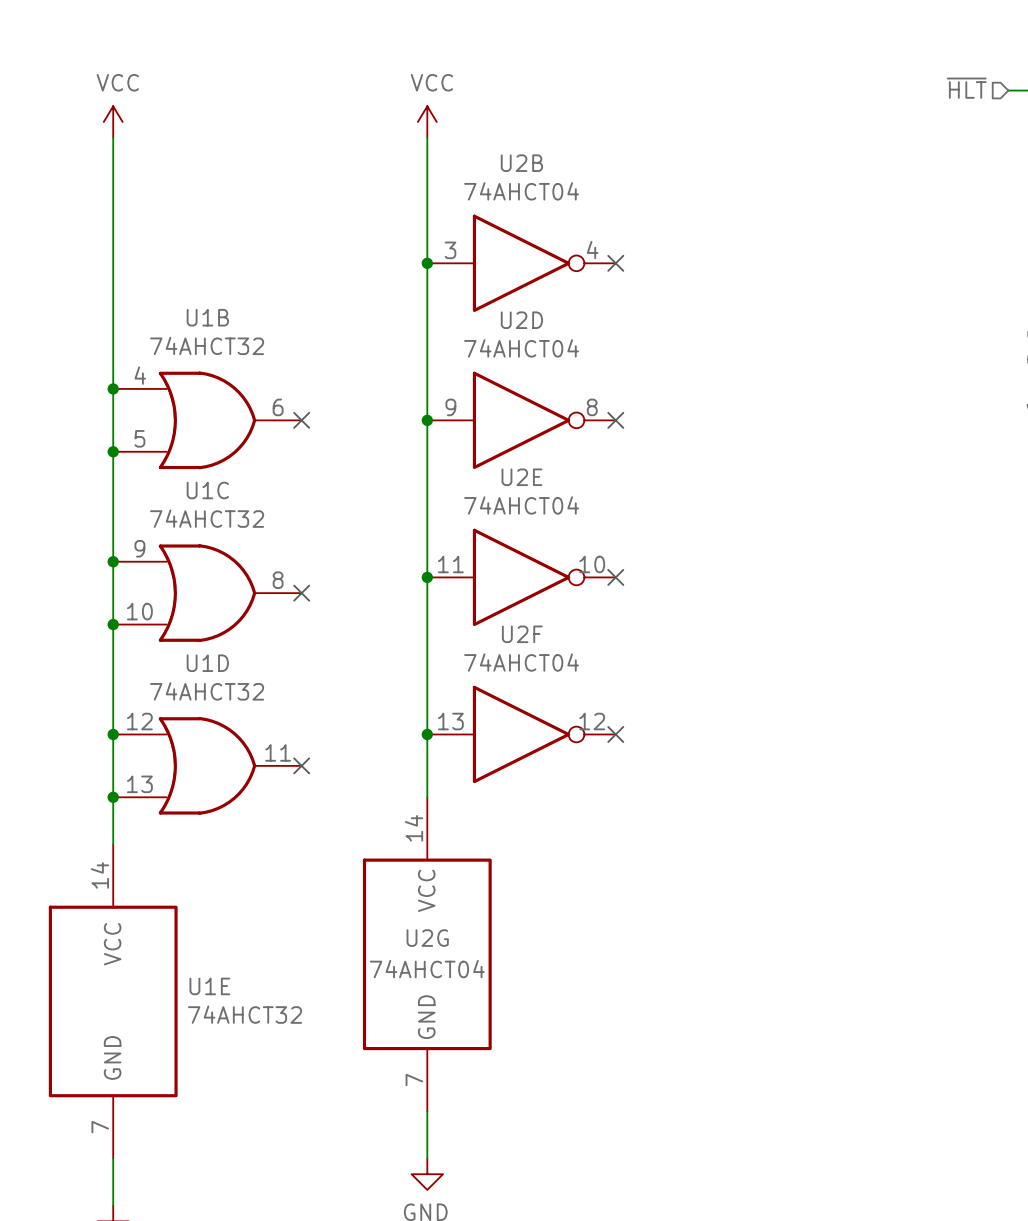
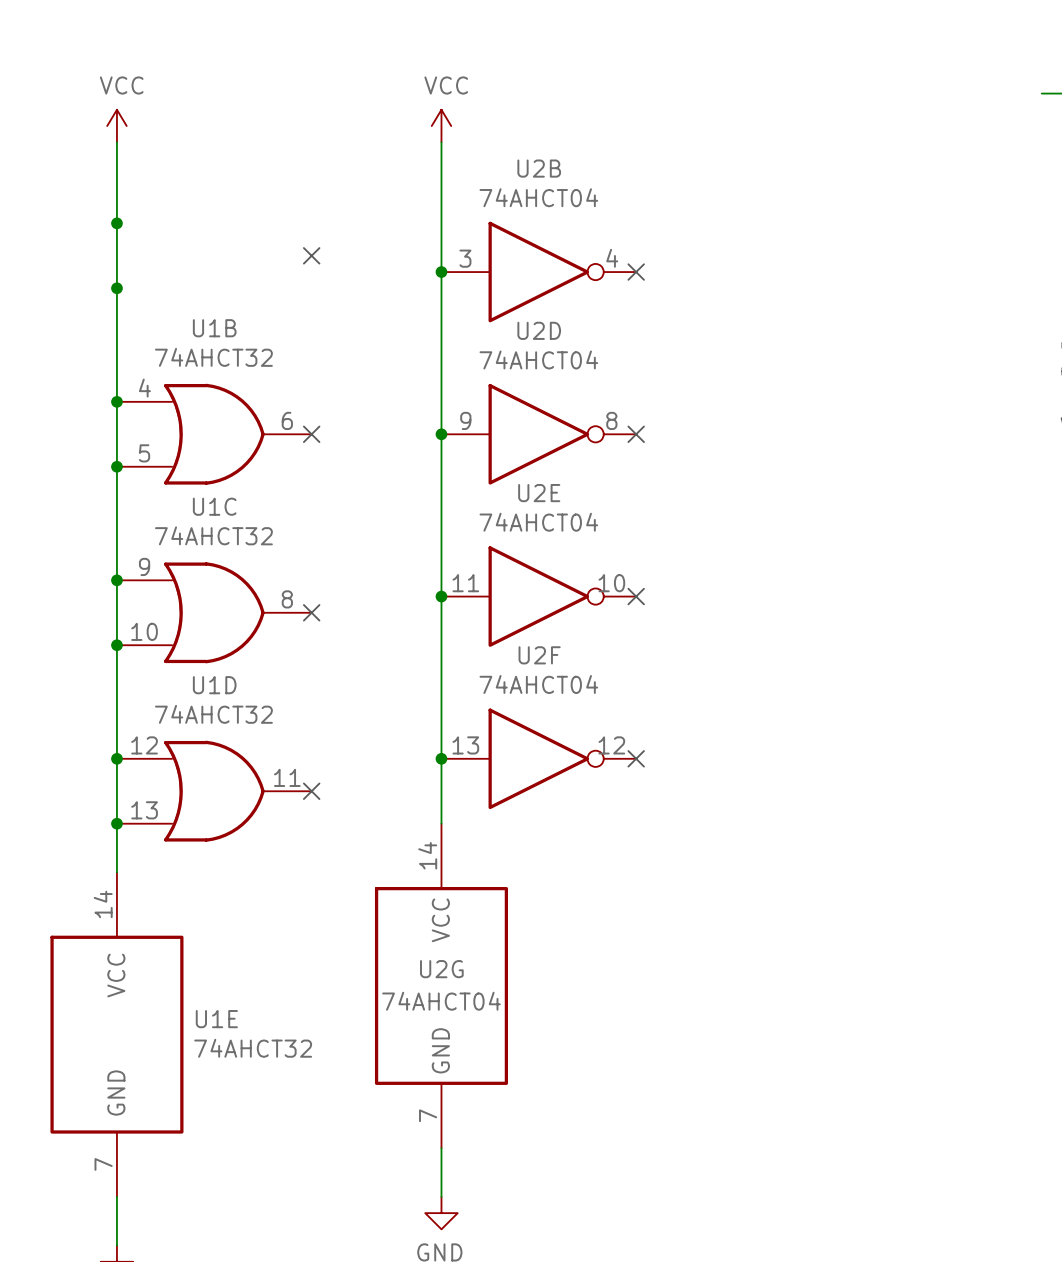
hierarchical label: ~{HLT} (966, 88) -> none
junction: none -> (116, 223)
no-connect mark: none -> (311, 255)
junction: none -> (116, 288)

